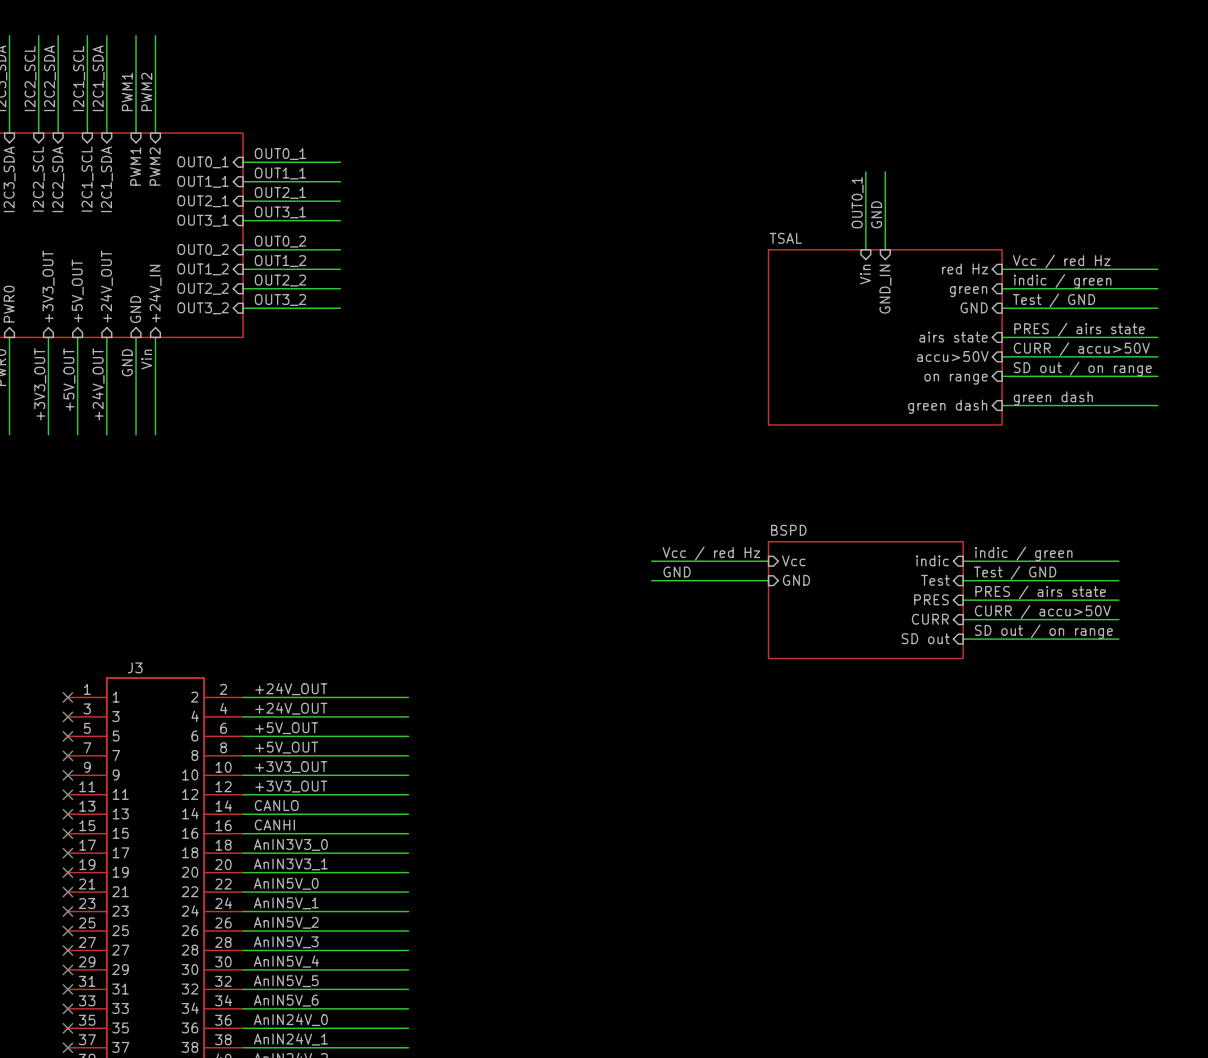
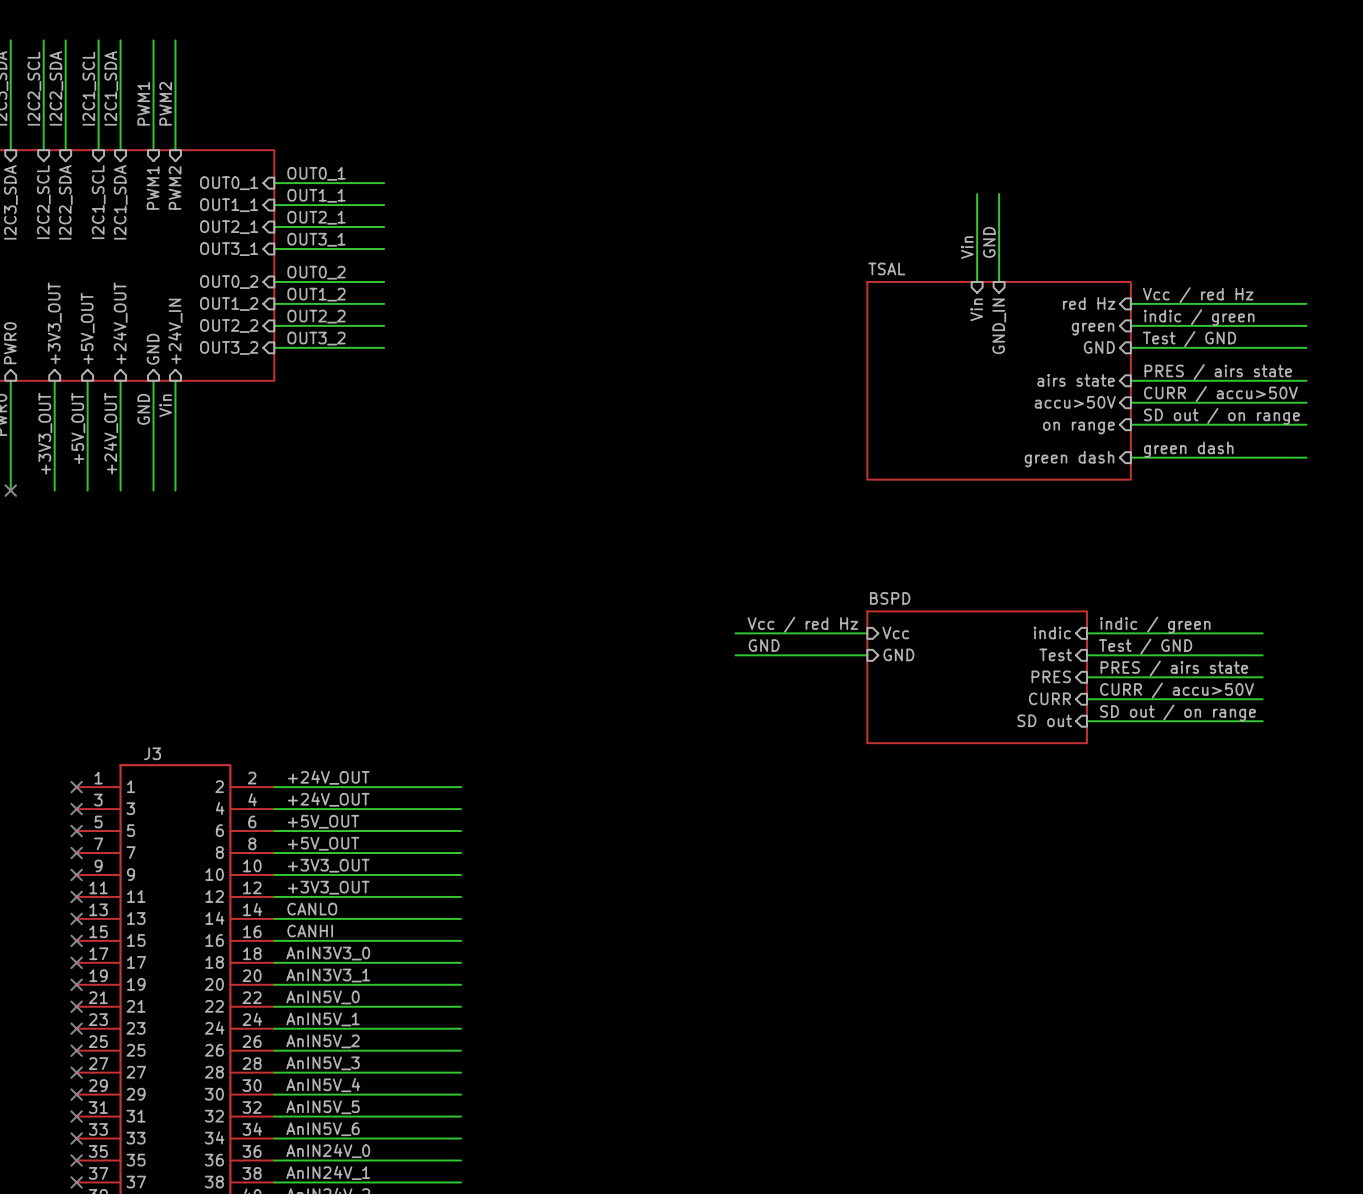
label: OUT0_1 (857, 202) -> Vin (967, 247)
no-connect mark: none -> (10, 490)

